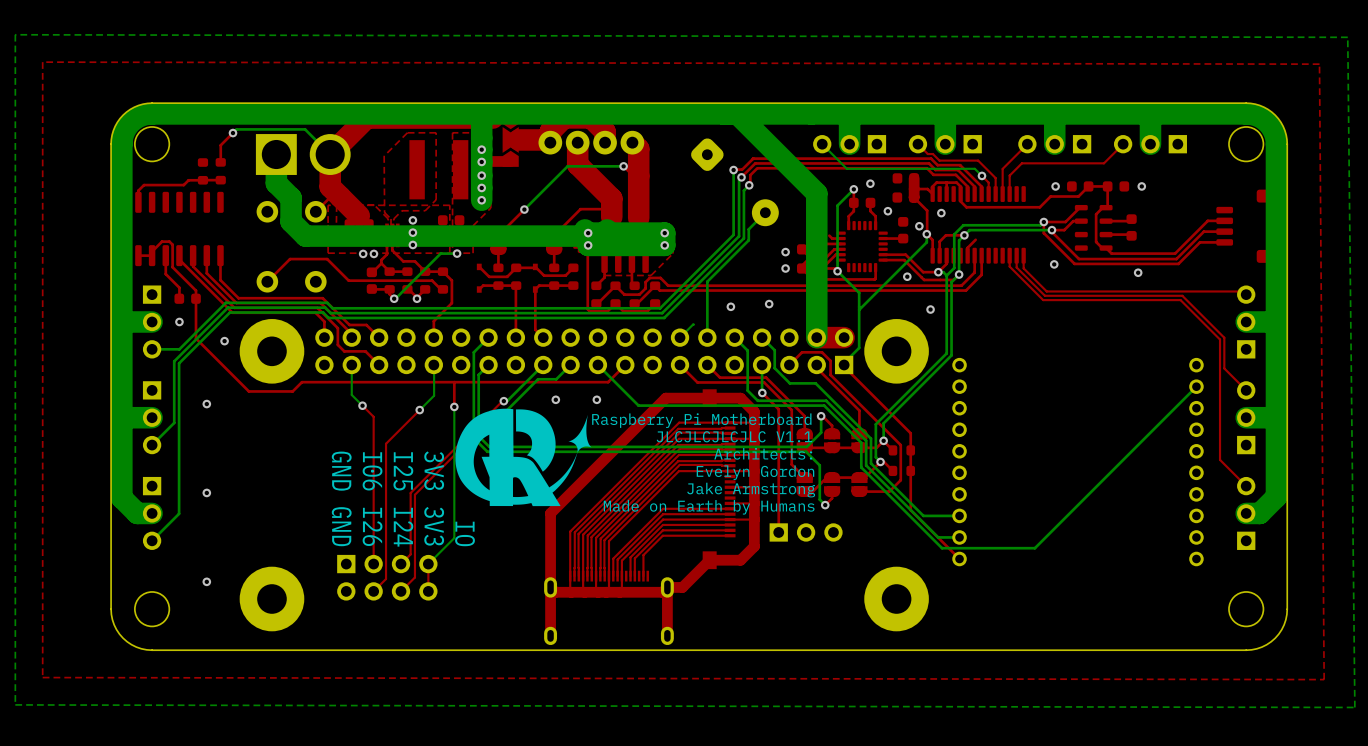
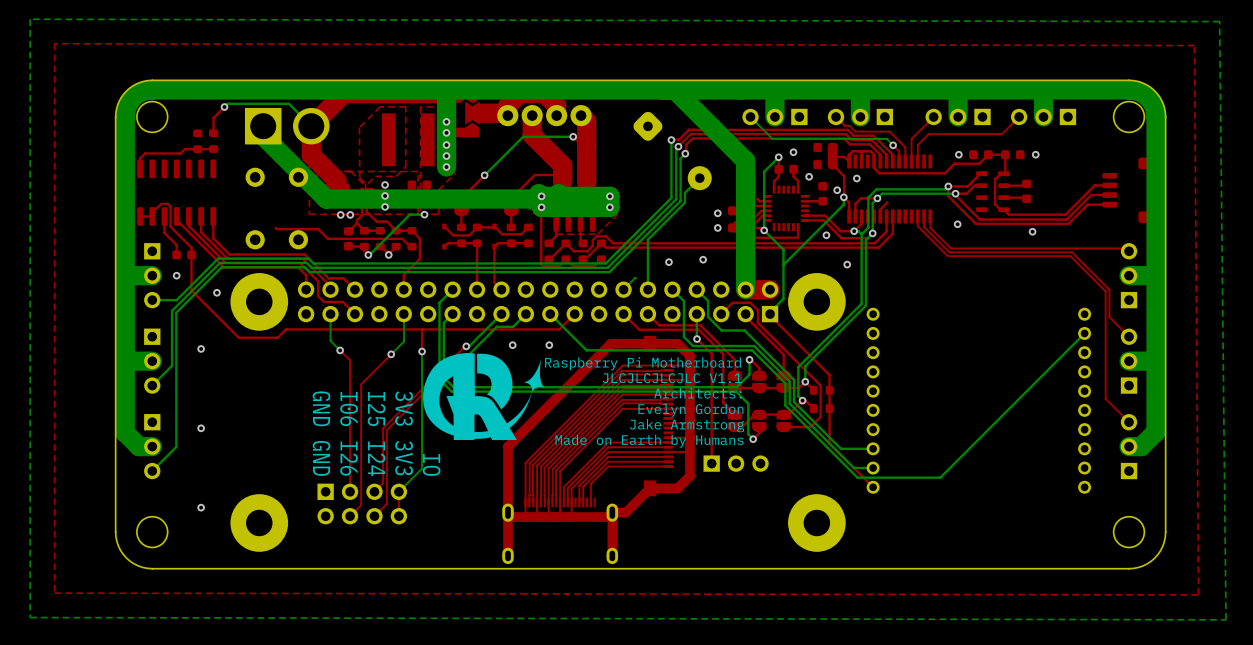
bottom track: (276, 165) (276, 183) (291, 197) (291, 221) (305, 236) (346, 236) -> (263, 135) (326, 199)
top track: (337, 269) (327, 259) (290, 259) (267, 281) -> (318, 229) (275, 227)

